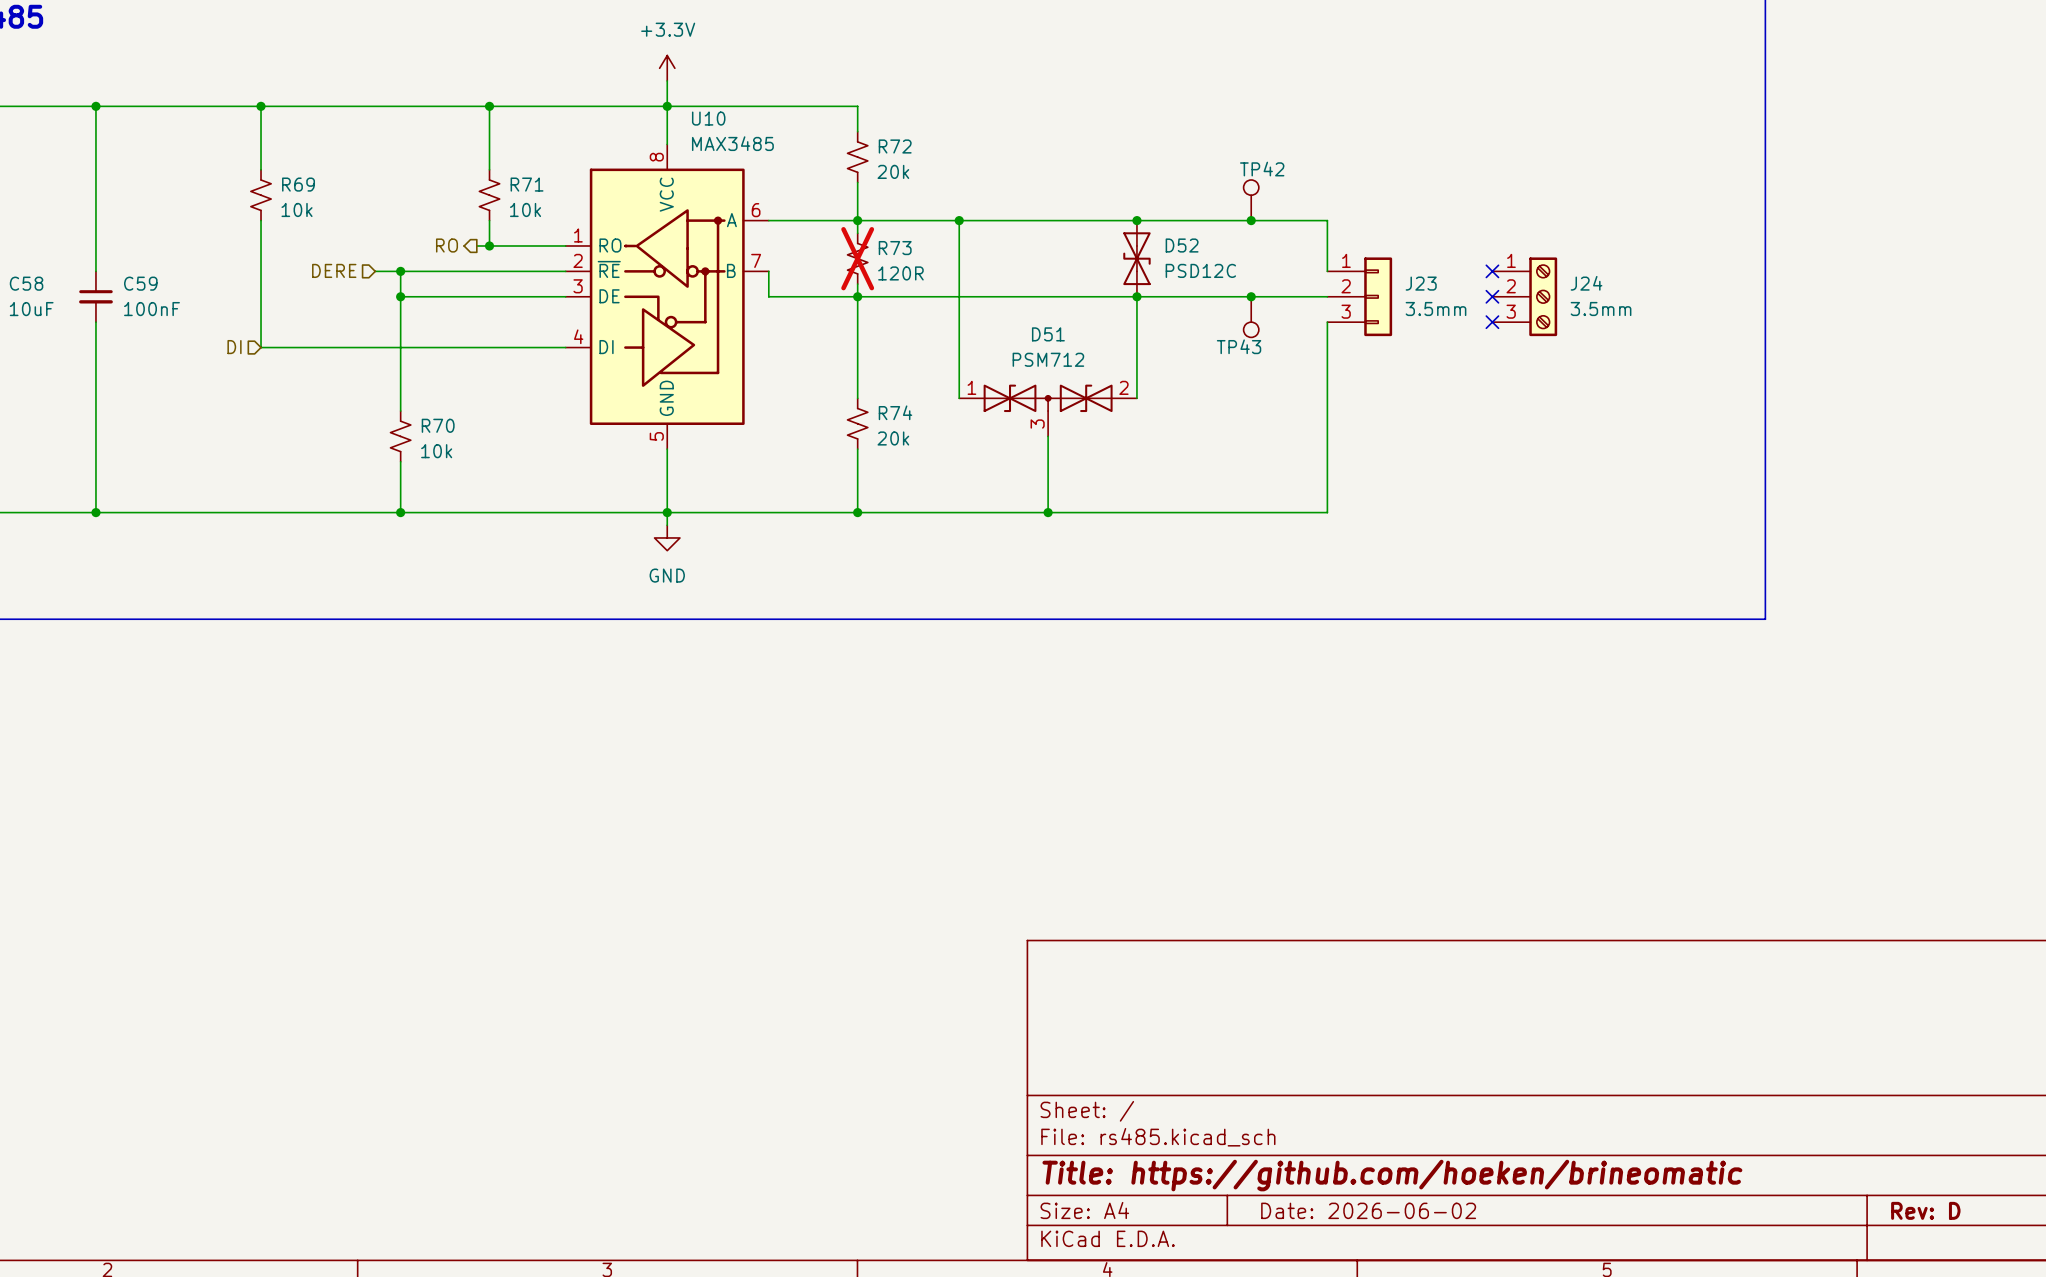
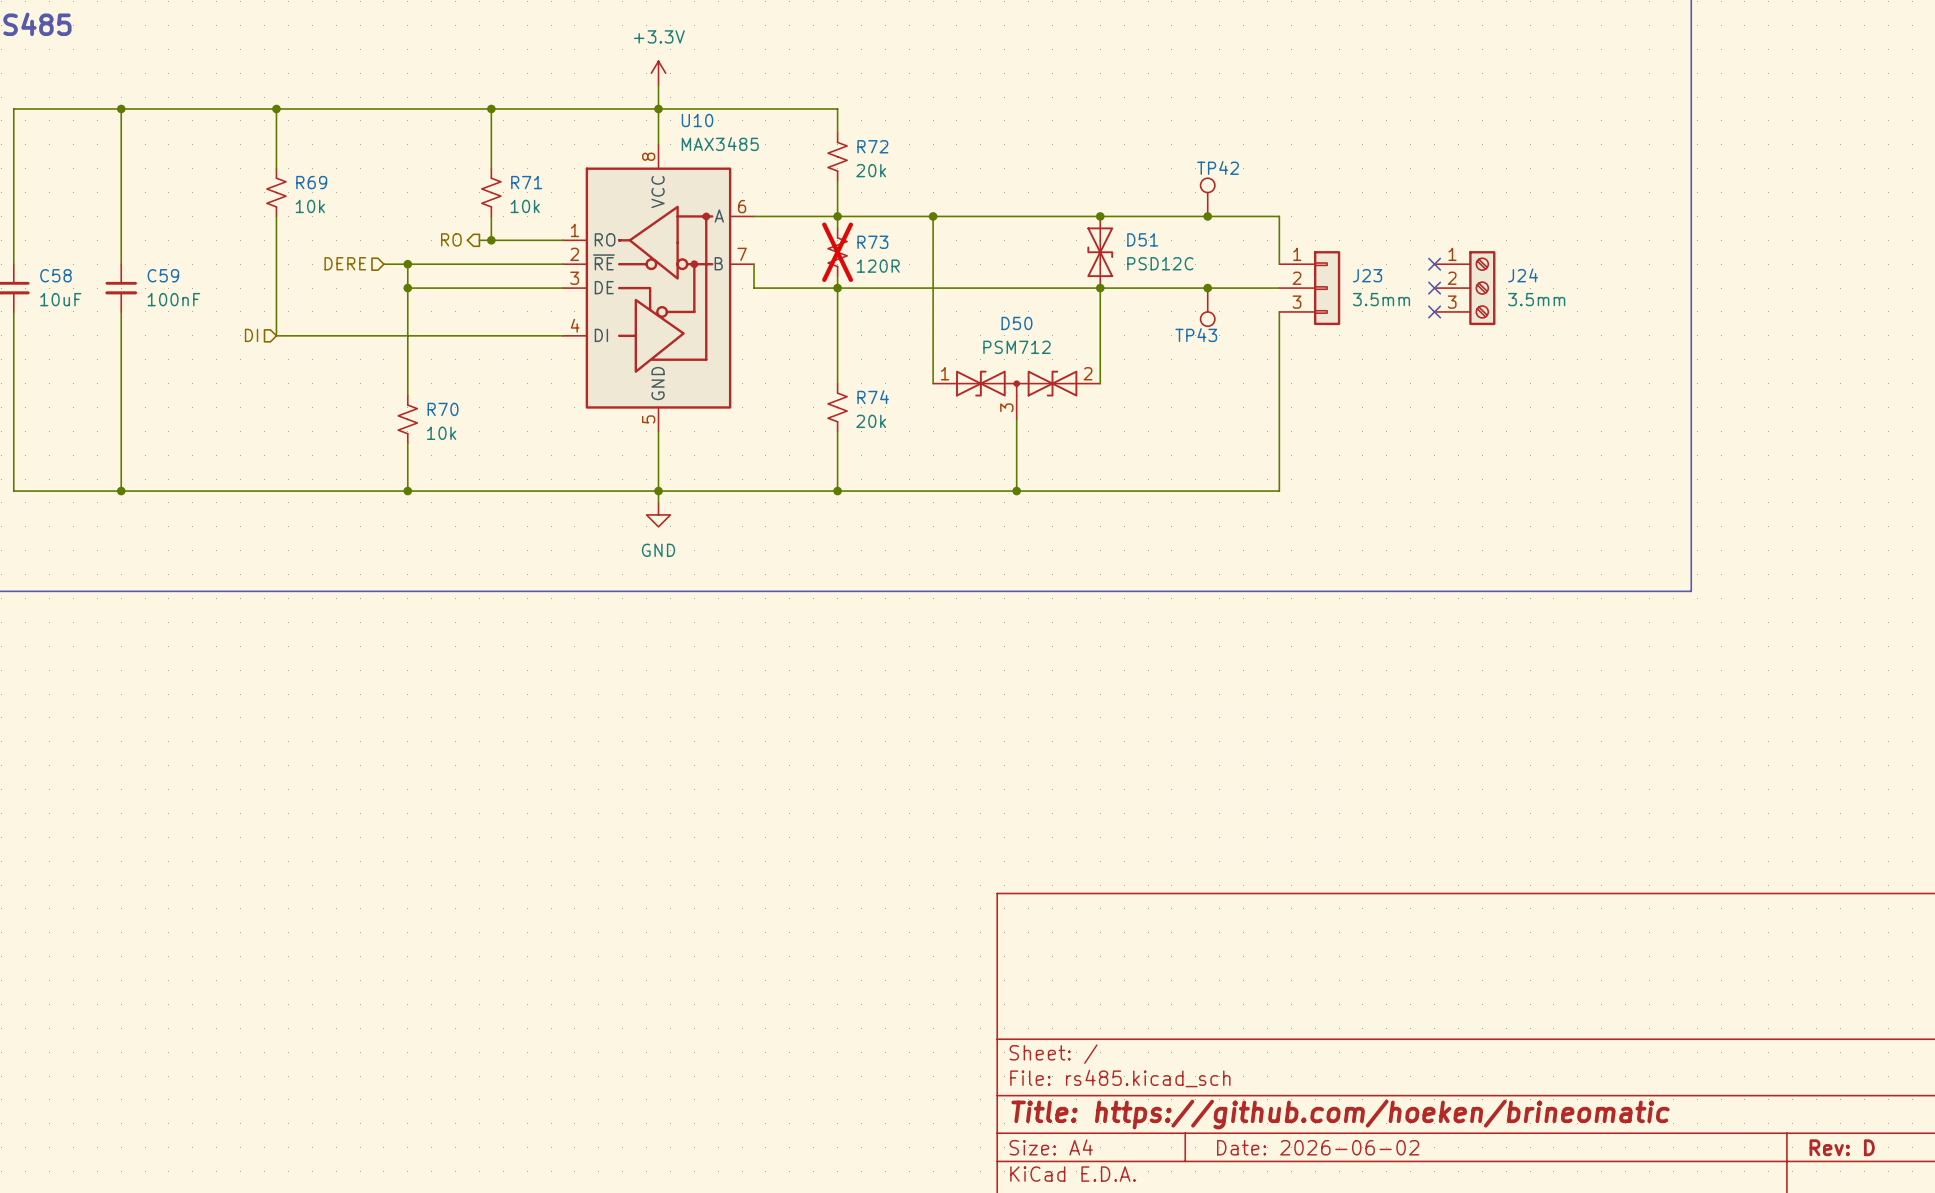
D52 name: D52 (1182, 245) -> D51 (1142, 239)
D51 name: D51 (1048, 334) -> D50 (1016, 323)

